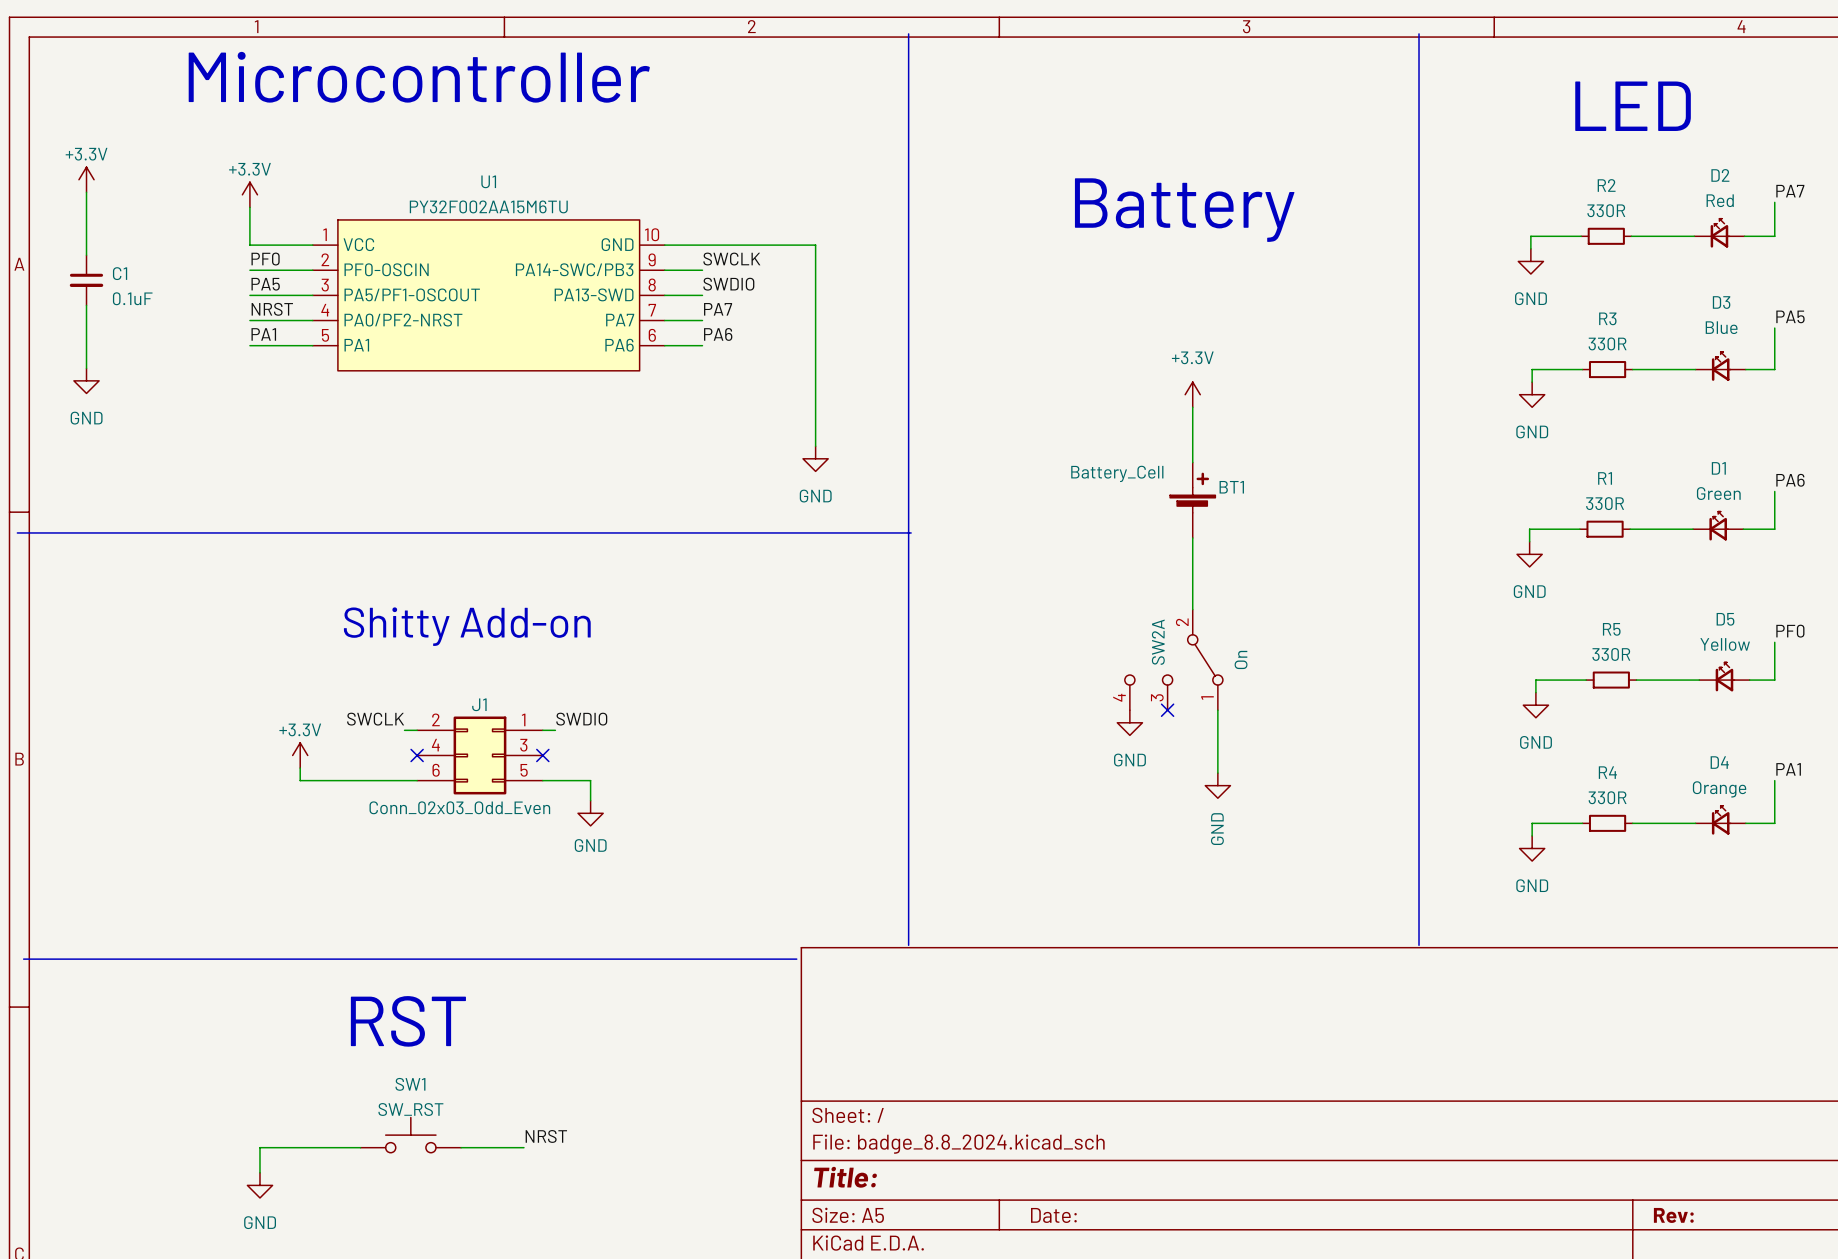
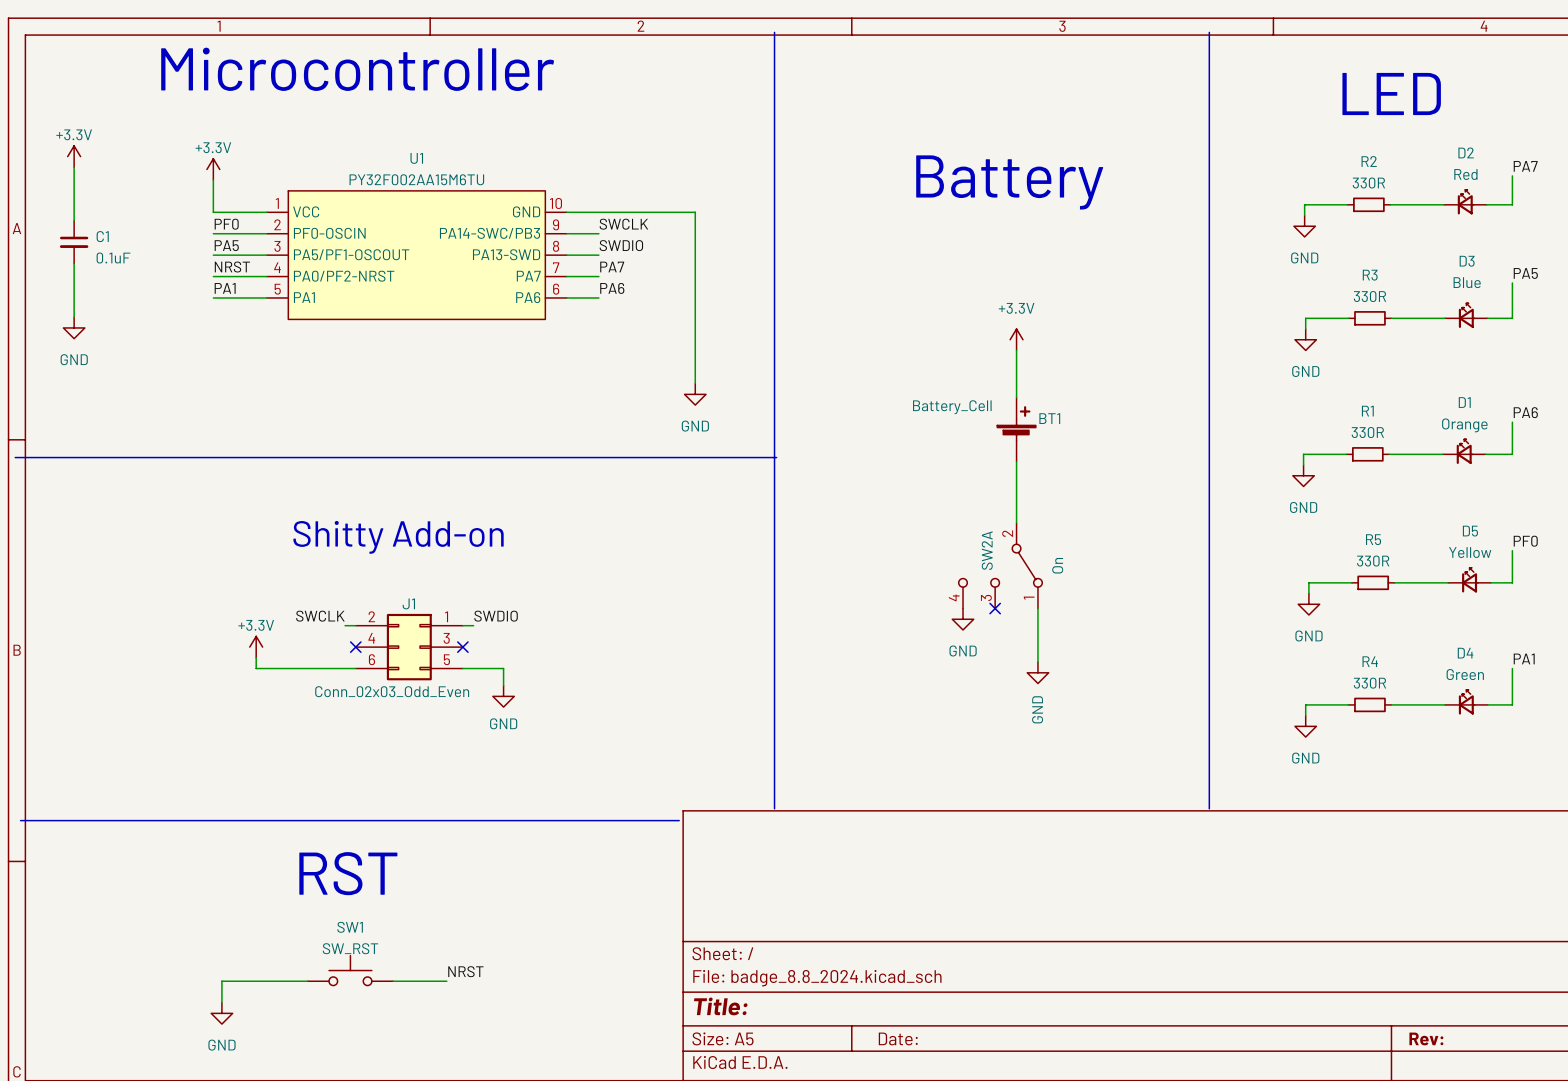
D1 value: Green (1718, 493) -> Orange (1464, 425)
D4 value: Orange (1719, 789) -> Green (1465, 674)

